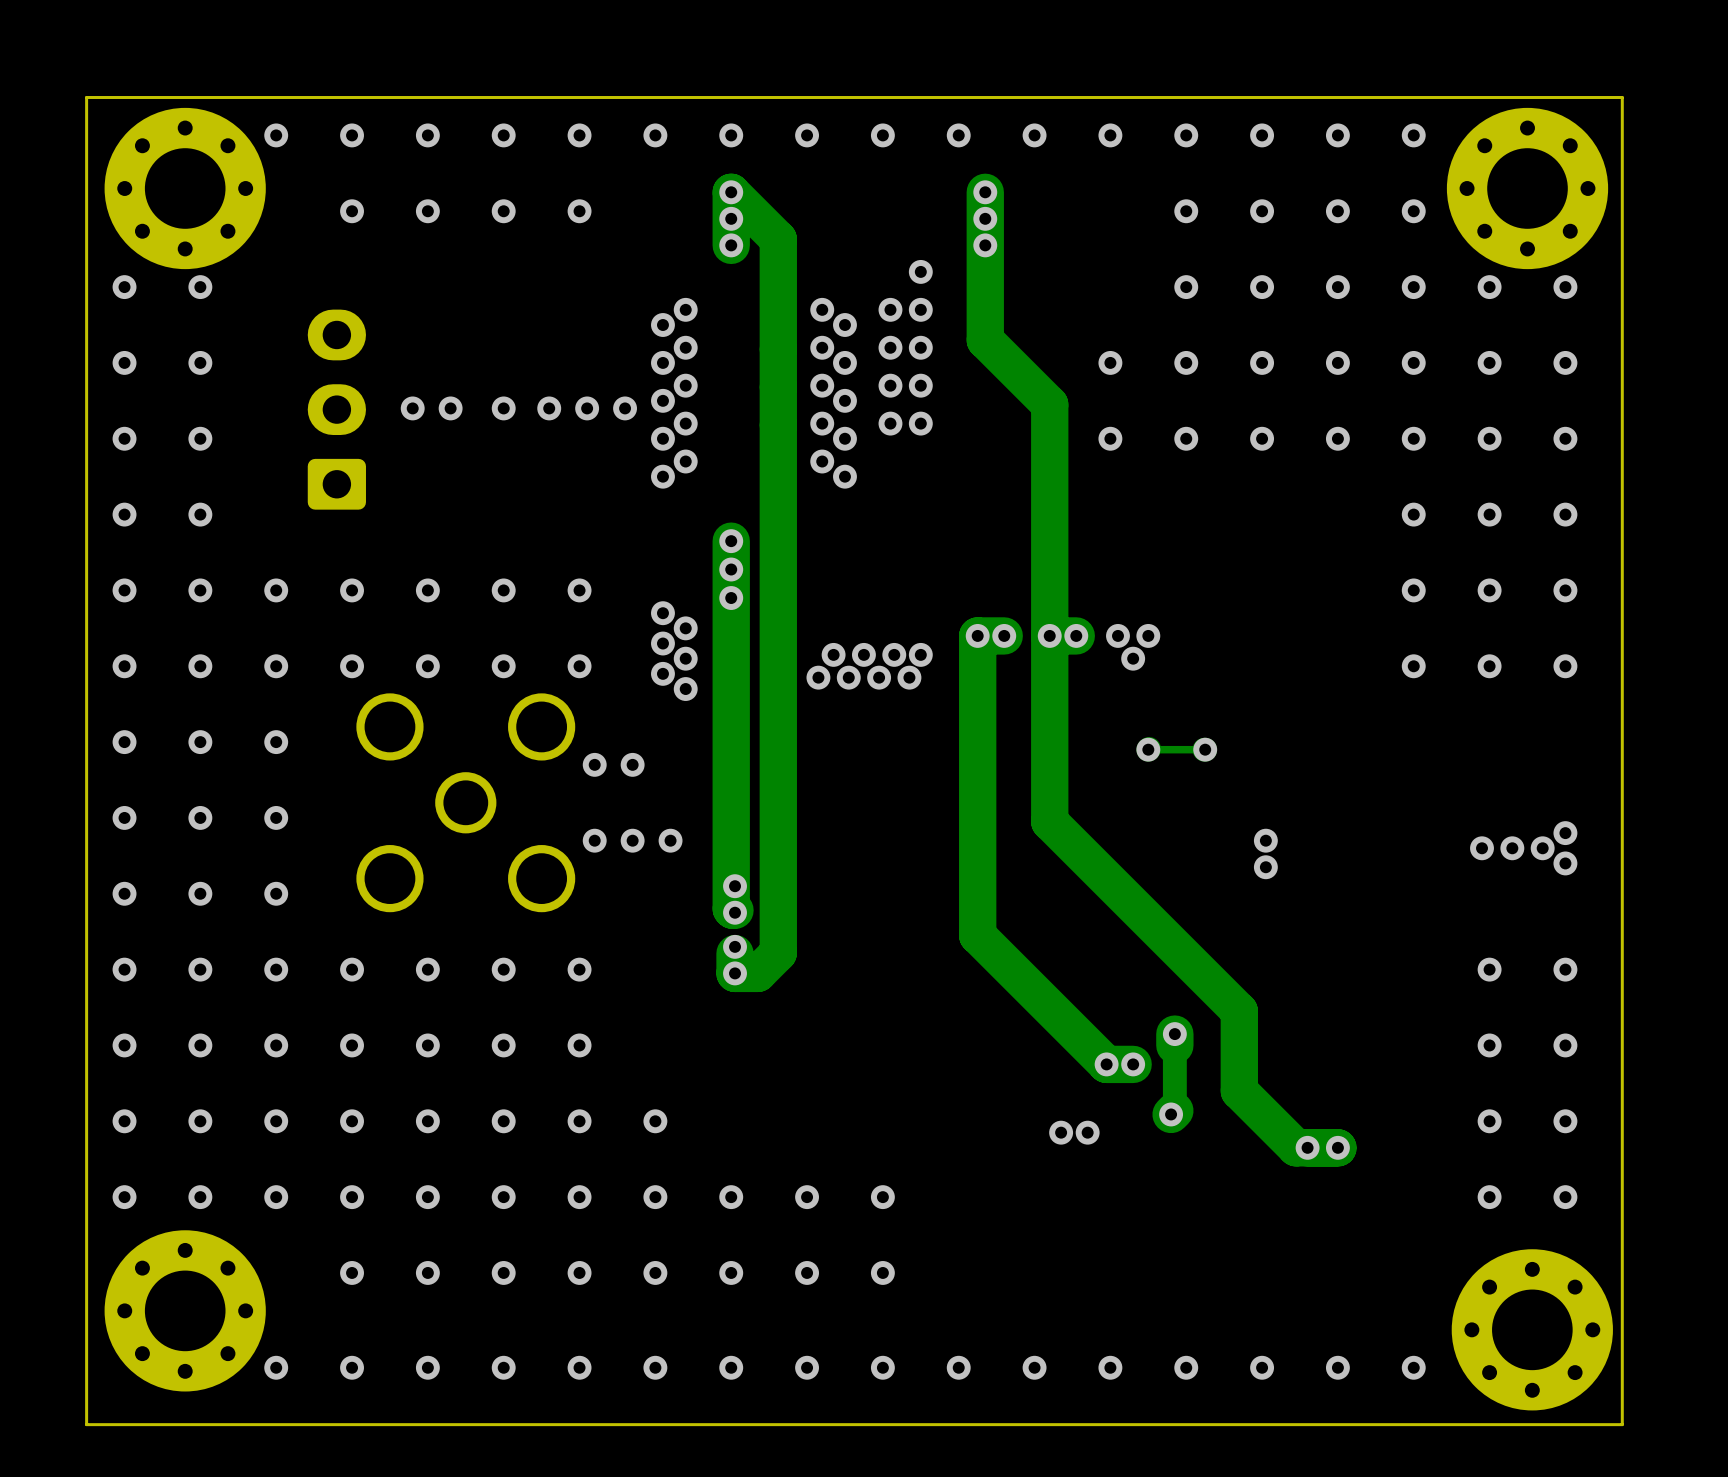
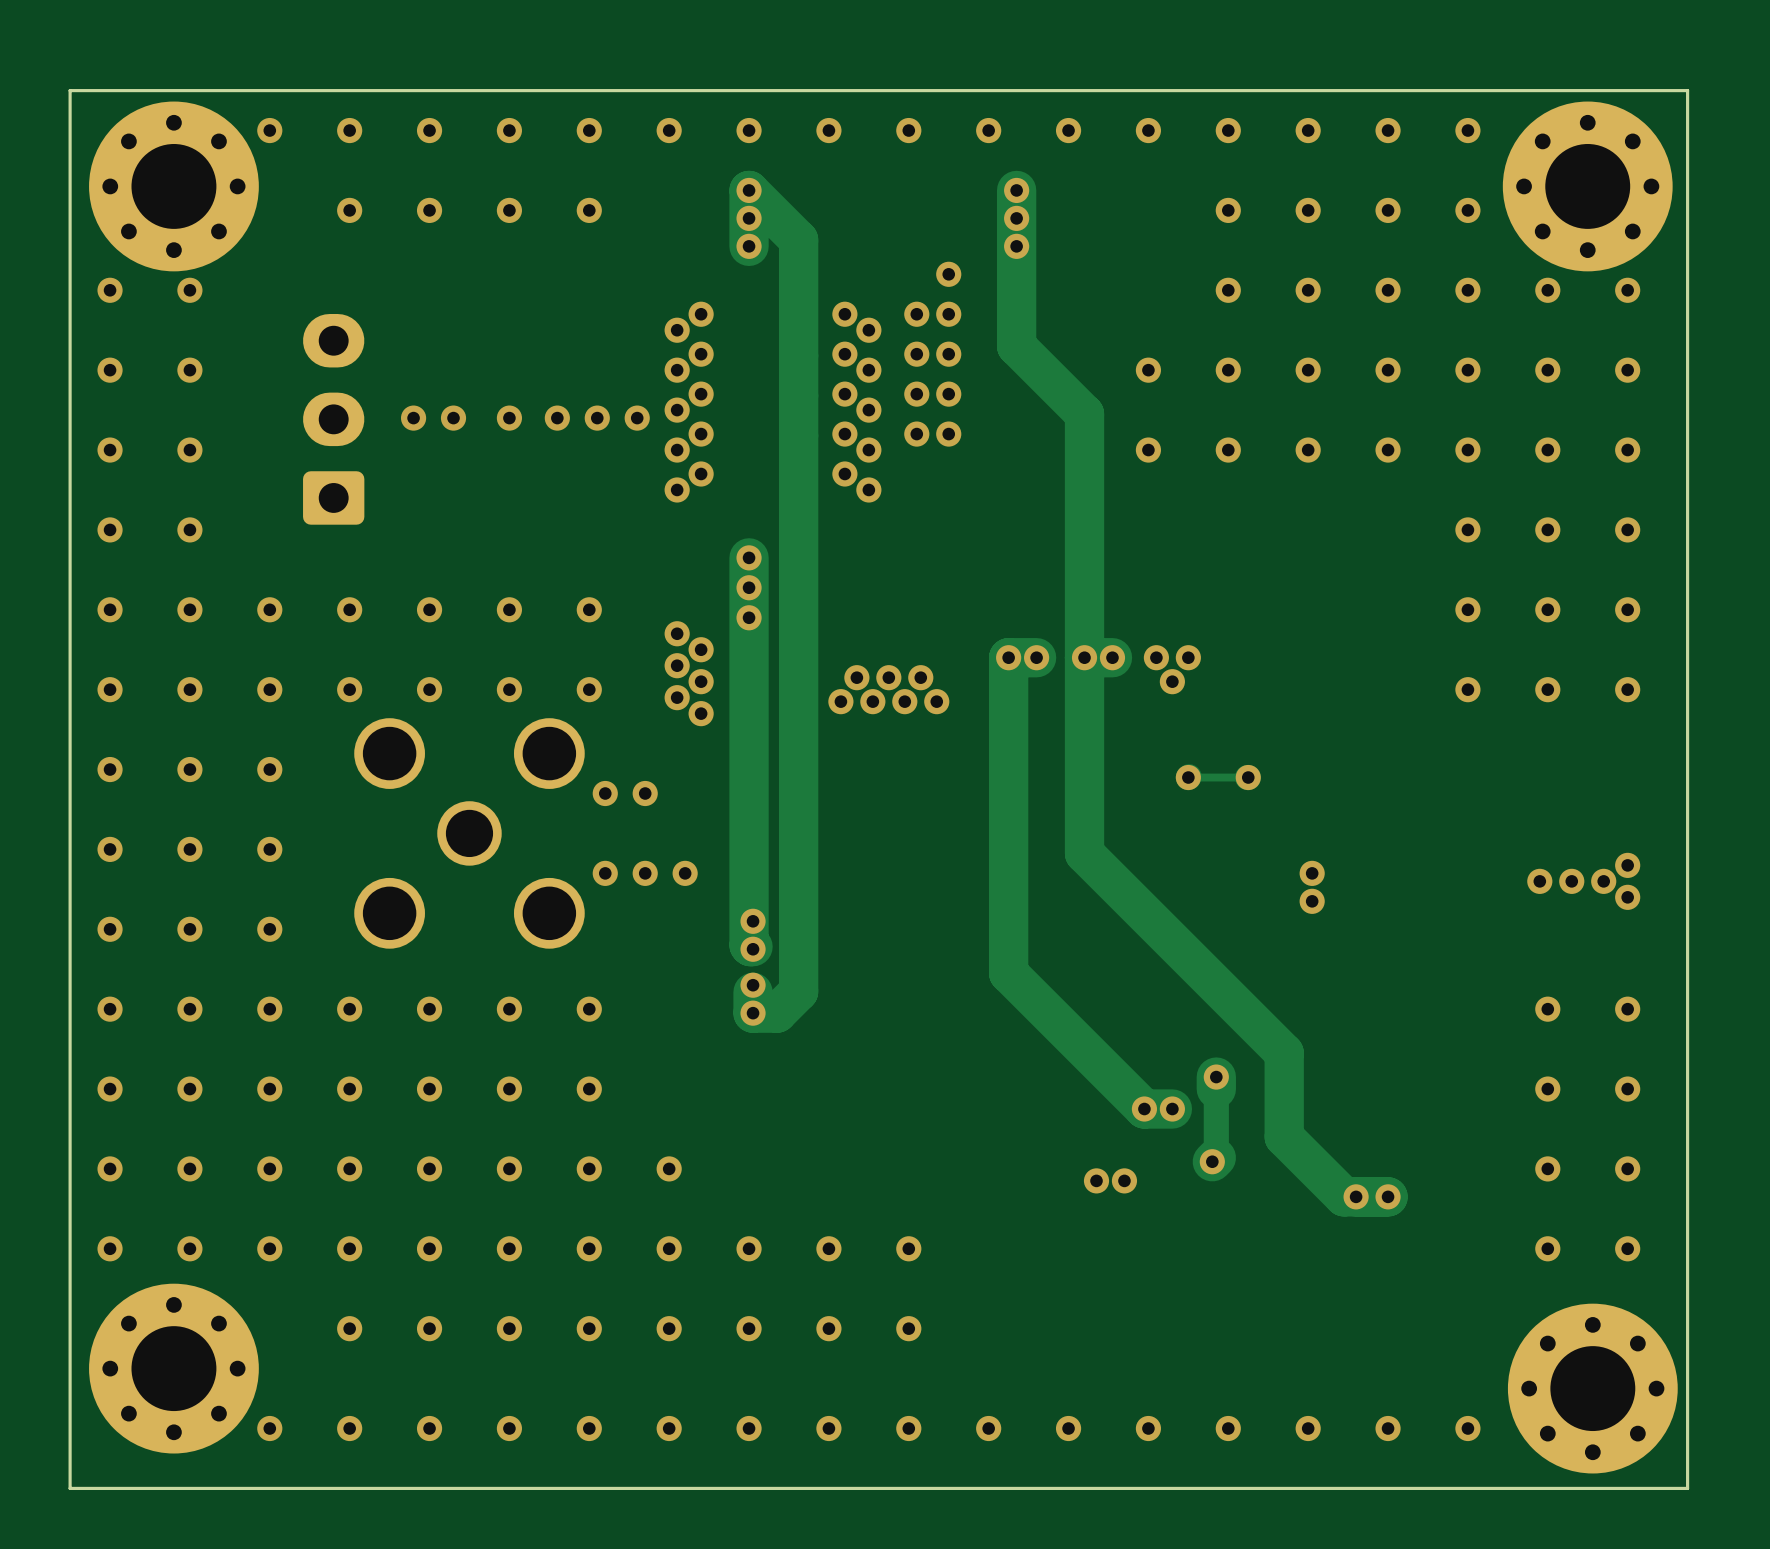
via: (920, 654) -> none

